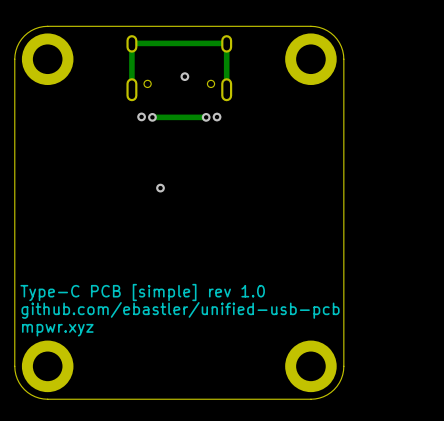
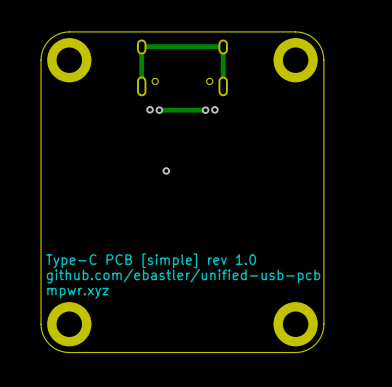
via: (184, 76) -> none

